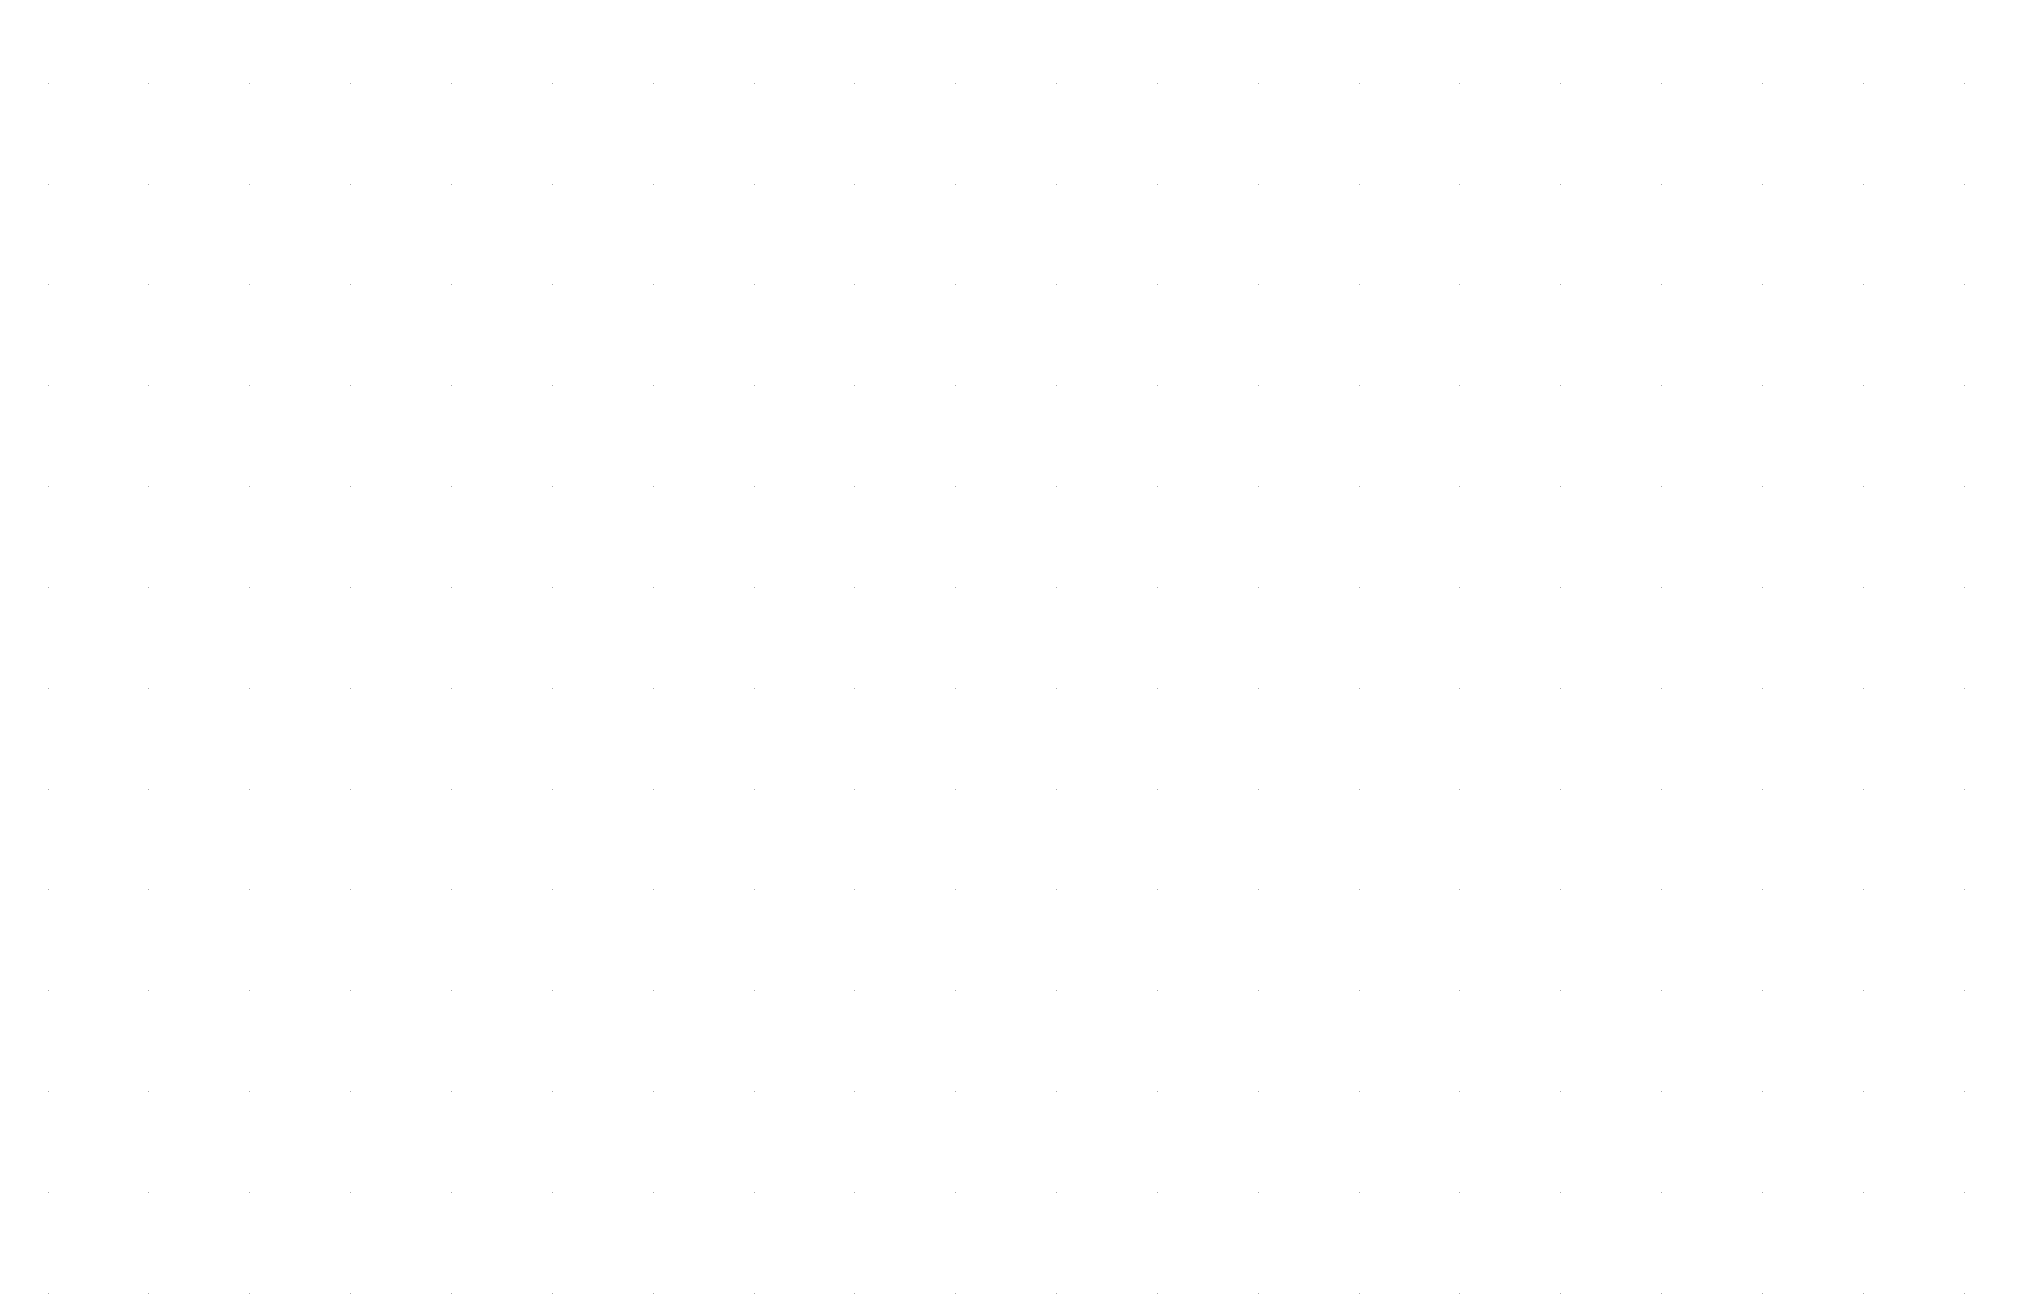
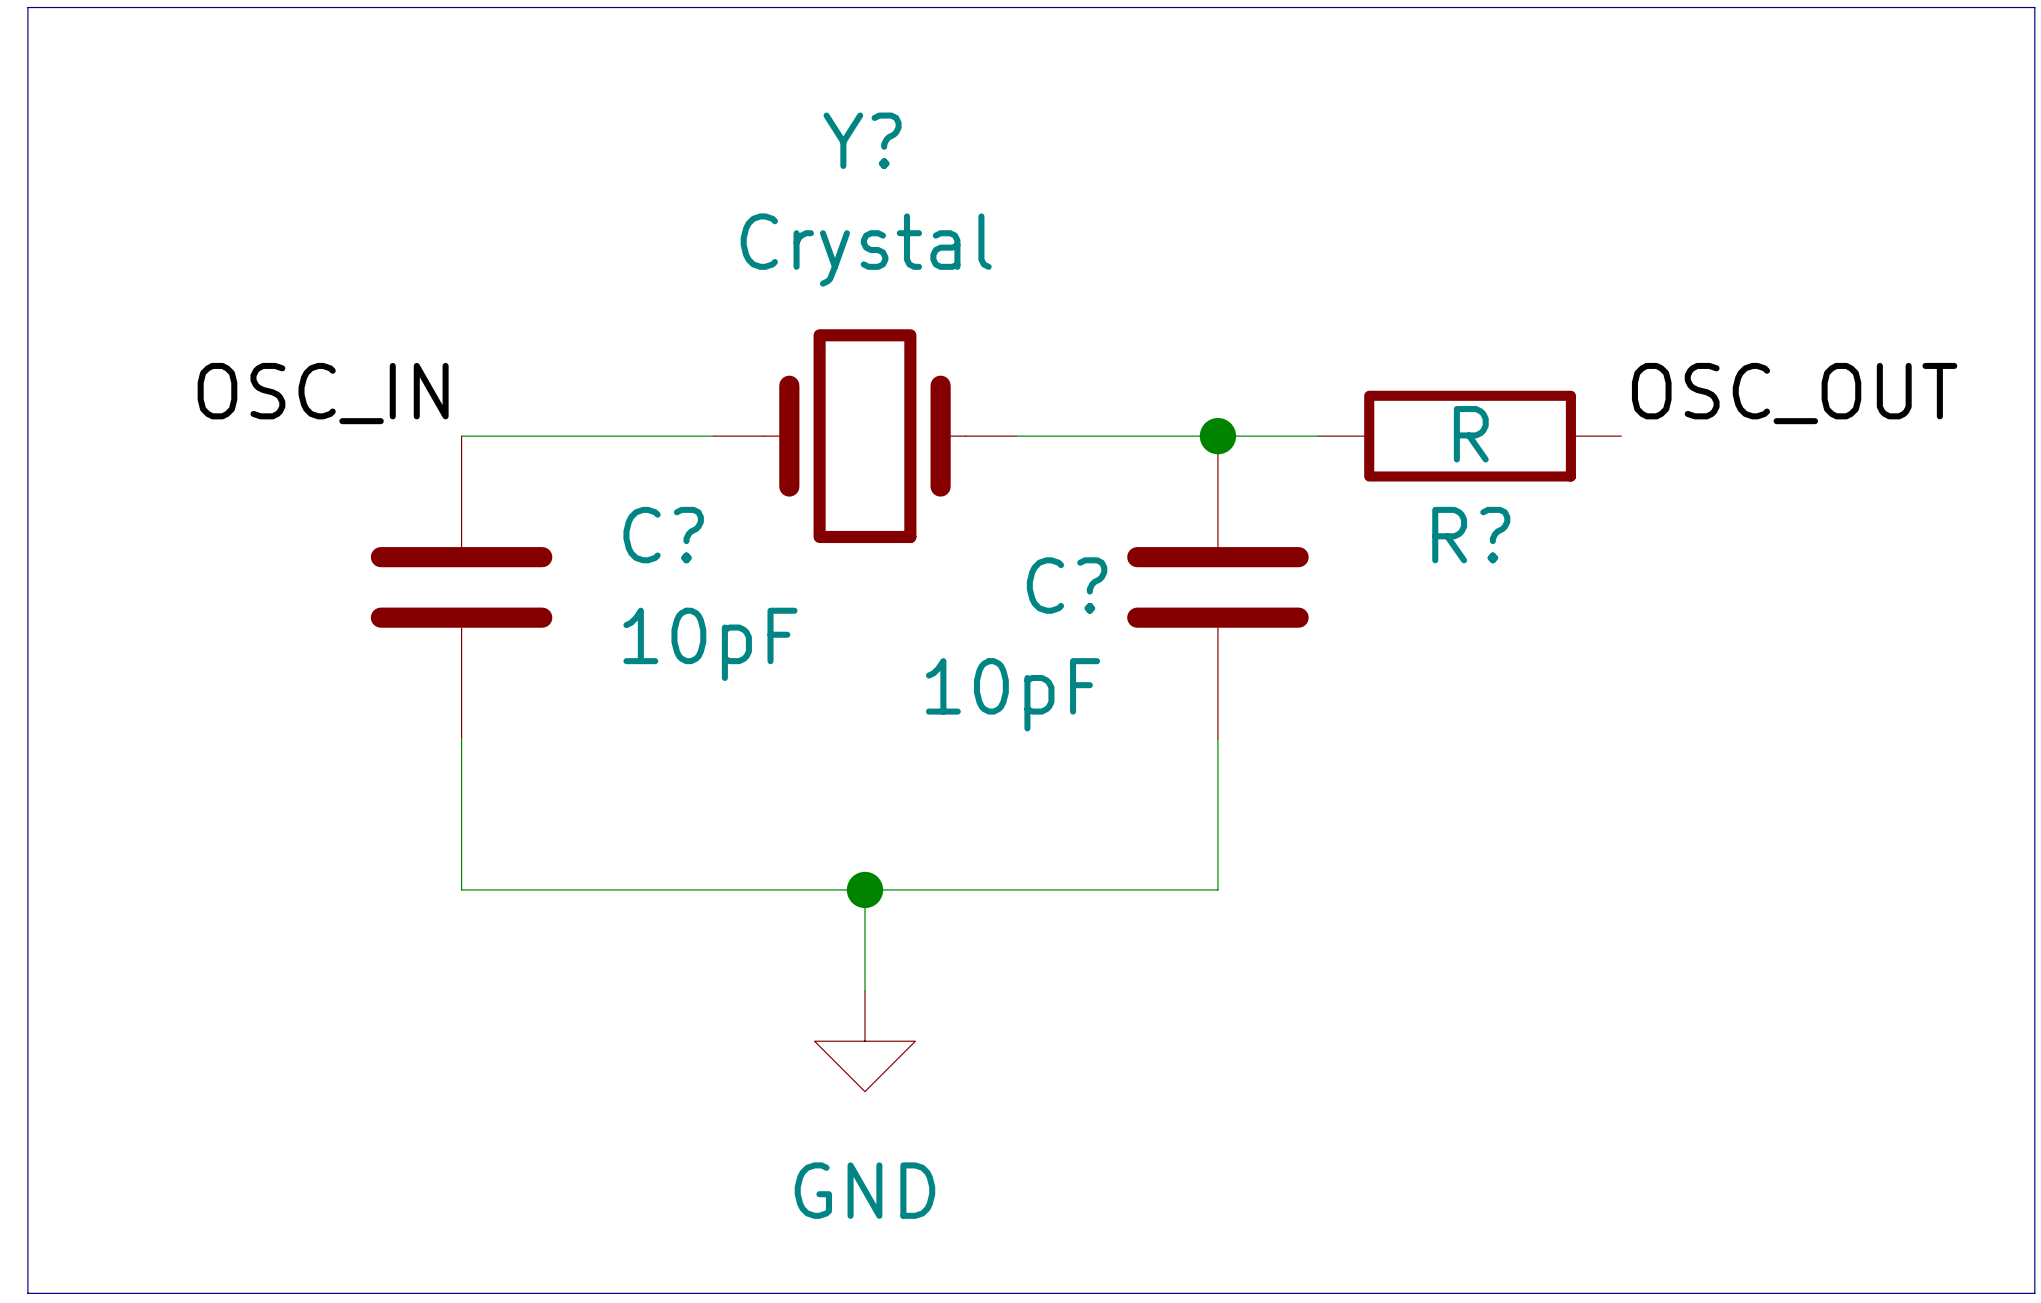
line: none -> (27, 7) (2034, 7) (2034, 1293) (27, 1293) (27, 7)
label: none -> OSC_IN (323, 393)
label: none -> OSC_OUT (1794, 393)
wire: none -> (461, 436) (713, 436)
Y?: none -> Crystal (864, 436)
wire: none -> (1016, 436) (1318, 436)
junction: none -> (1217, 436)
R?: none -> R (1470, 436)
C?: none -> 10pF (461, 587)
C?: none -> 10pF (1217, 587)
wire: none -> (461, 738) (461, 889) (1217, 889) (1217, 738)
wire: none -> (864, 889) (864, 990)
junction: none -> (864, 889)
power symbol: none -> GND (864, 1041)

